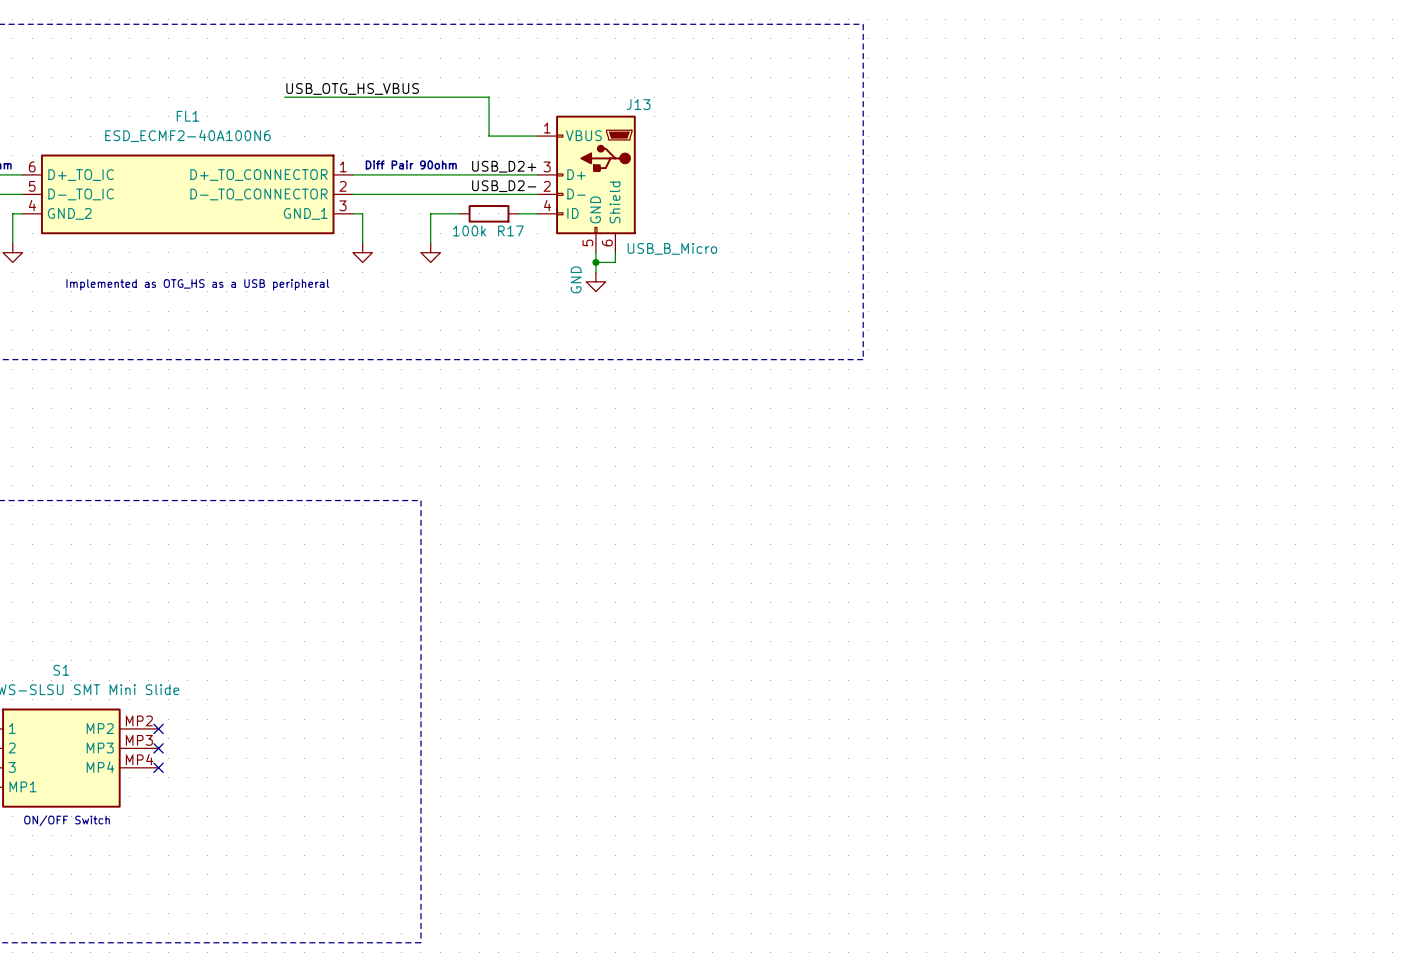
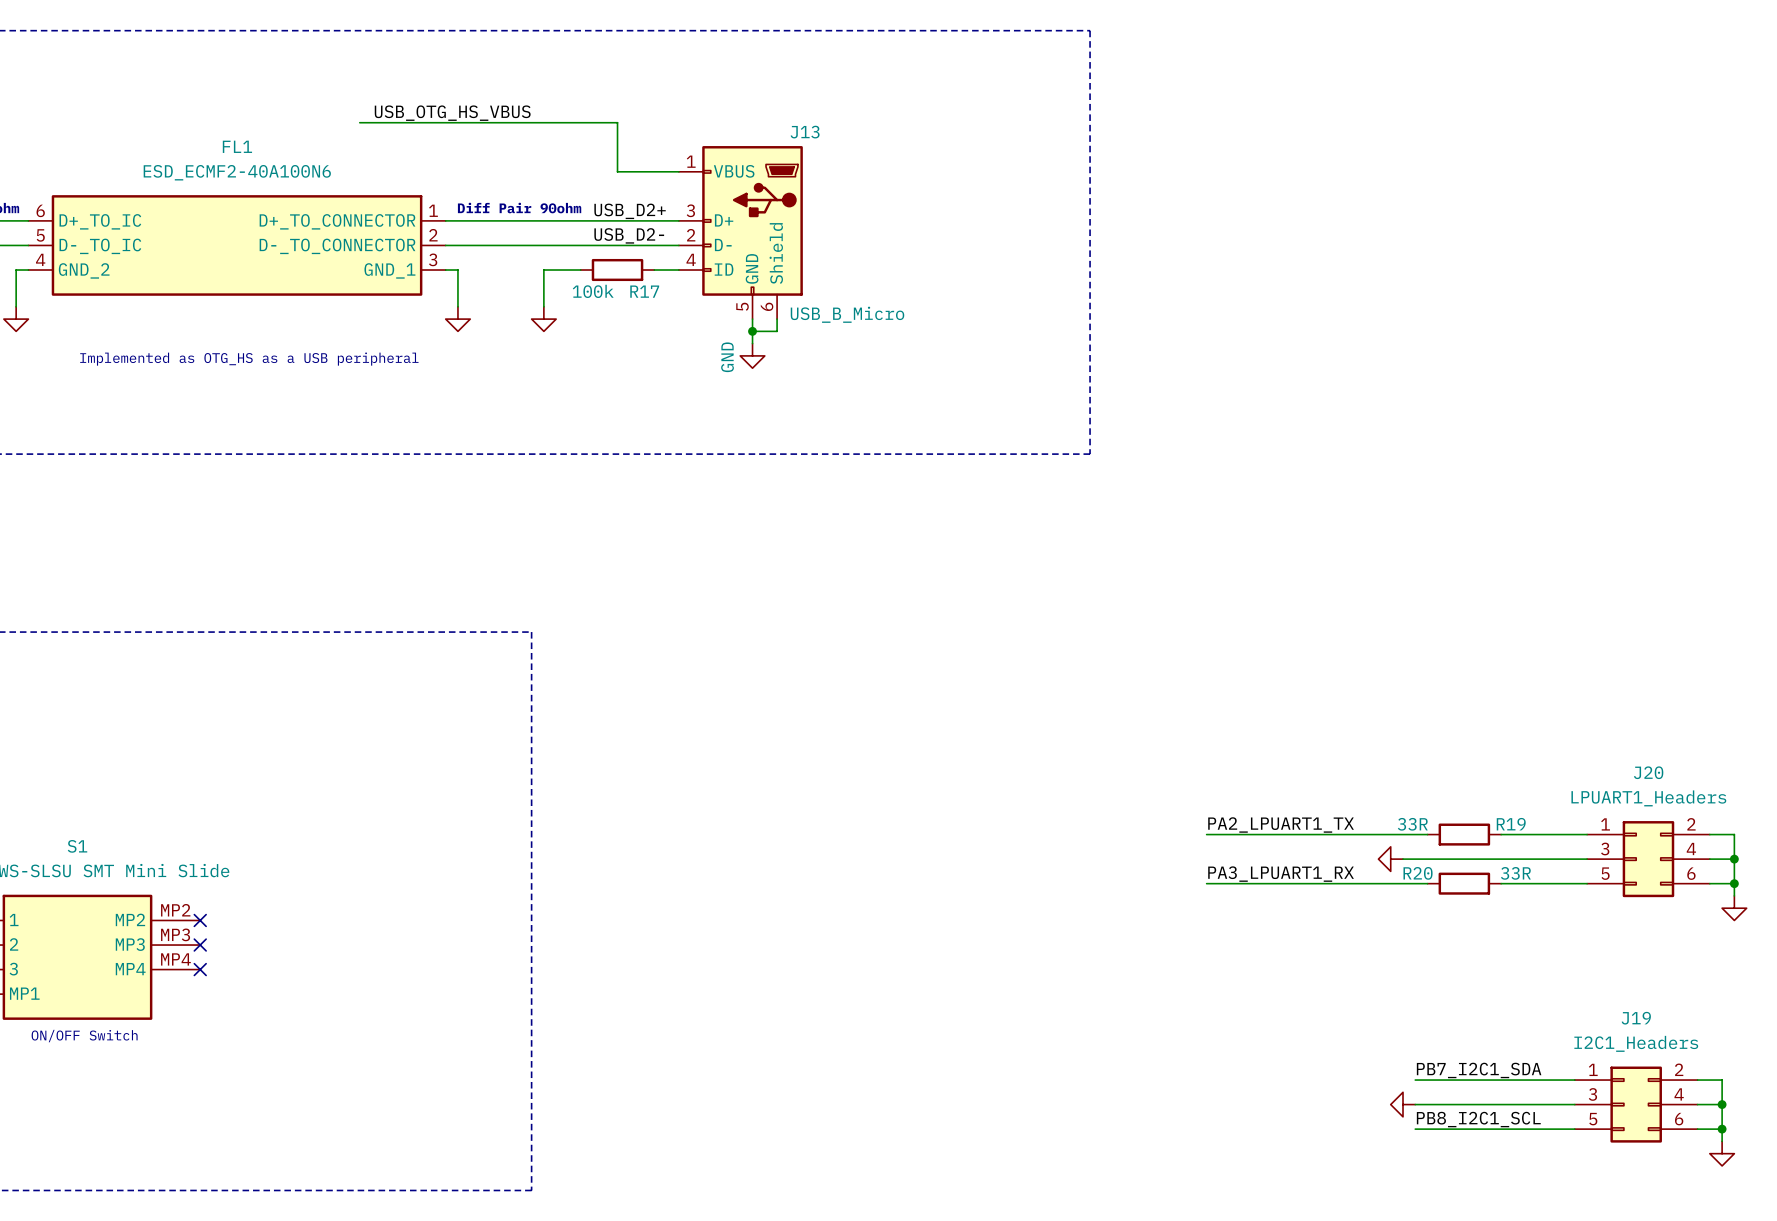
label: none -> PA2_LPUART1_TX (1281, 824)
wire: none -> (1206, 834) (1427, 834)
R19: none -> 33R (1464, 834)
wire: none -> (1501, 834) (1587, 834)
wire: none -> (1709, 834) (1734, 834) (1734, 895)
power symbol: none -> (1390, 859)
wire: none -> (1403, 859) (1587, 859)
J20: none -> LPUART1_Headers (1648, 859)
wire: none -> (1709, 859) (1734, 859)
junction: none -> (1734, 859)
label: none -> PA3_LPUART1_RX (1281, 874)
wire: none -> (1206, 883) (1427, 883)
R20: none -> 33R (1464, 883)
wire: none -> (1501, 883) (1587, 883)
wire: none -> (1709, 883) (1734, 883)
junction: none -> (1734, 883)
power symbol: none -> (1734, 908)
label: none -> PB7_I2C1_SDA (1479, 1070)
wire: none -> (1415, 1080) (1574, 1080)
wire: none -> (1697, 1080) (1722, 1080) (1722, 1141)
power symbol: none -> (1403, 1104)
wire: none -> (1415, 1104) (1574, 1104)
J19: none -> I2C1_Headers (1636, 1104)
wire: none -> (1697, 1104) (1722, 1104)
junction: none -> (1722, 1104)
label: none -> PB8_I2C1_SCL (1478, 1119)
wire: none -> (1415, 1129) (1574, 1129)
wire: none -> (1697, 1129) (1722, 1129)
junction: none -> (1722, 1129)
power symbol: none -> (1722, 1153)

